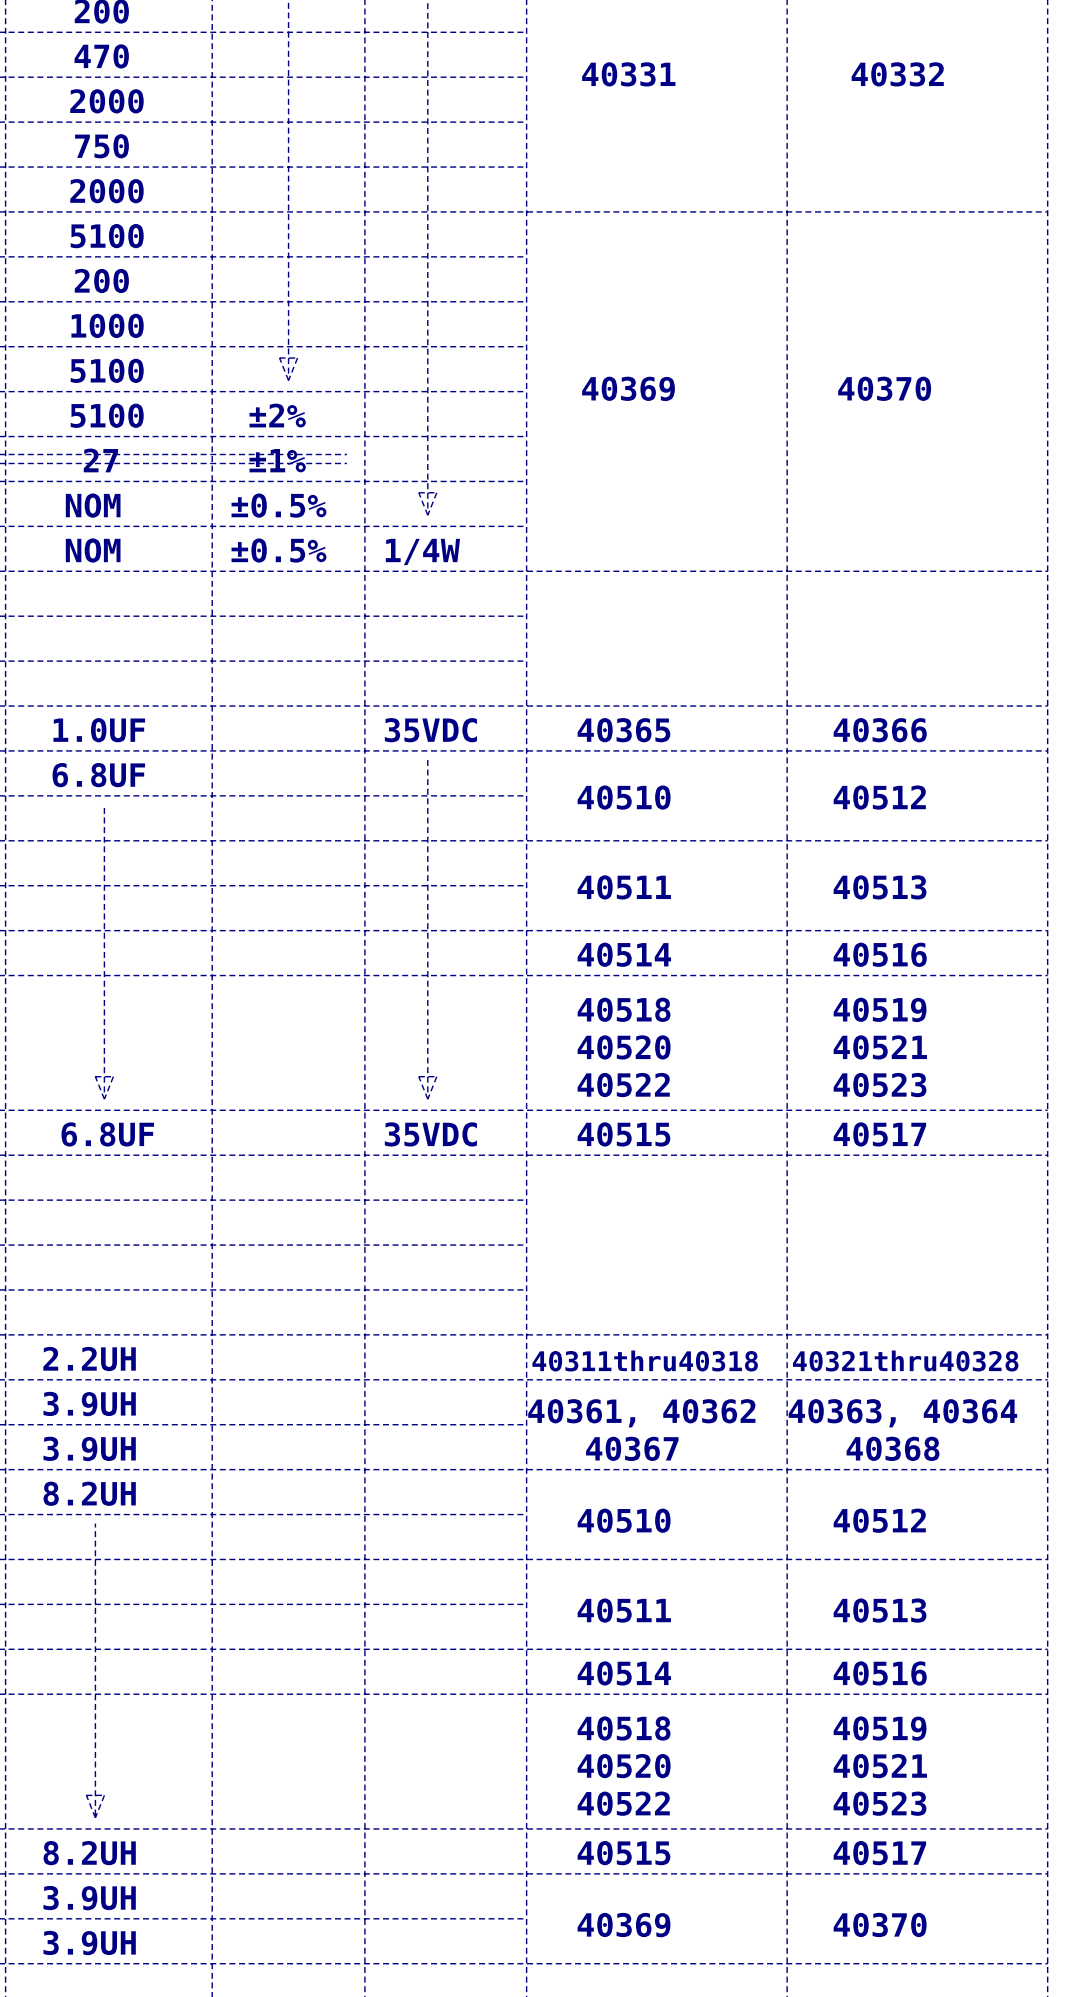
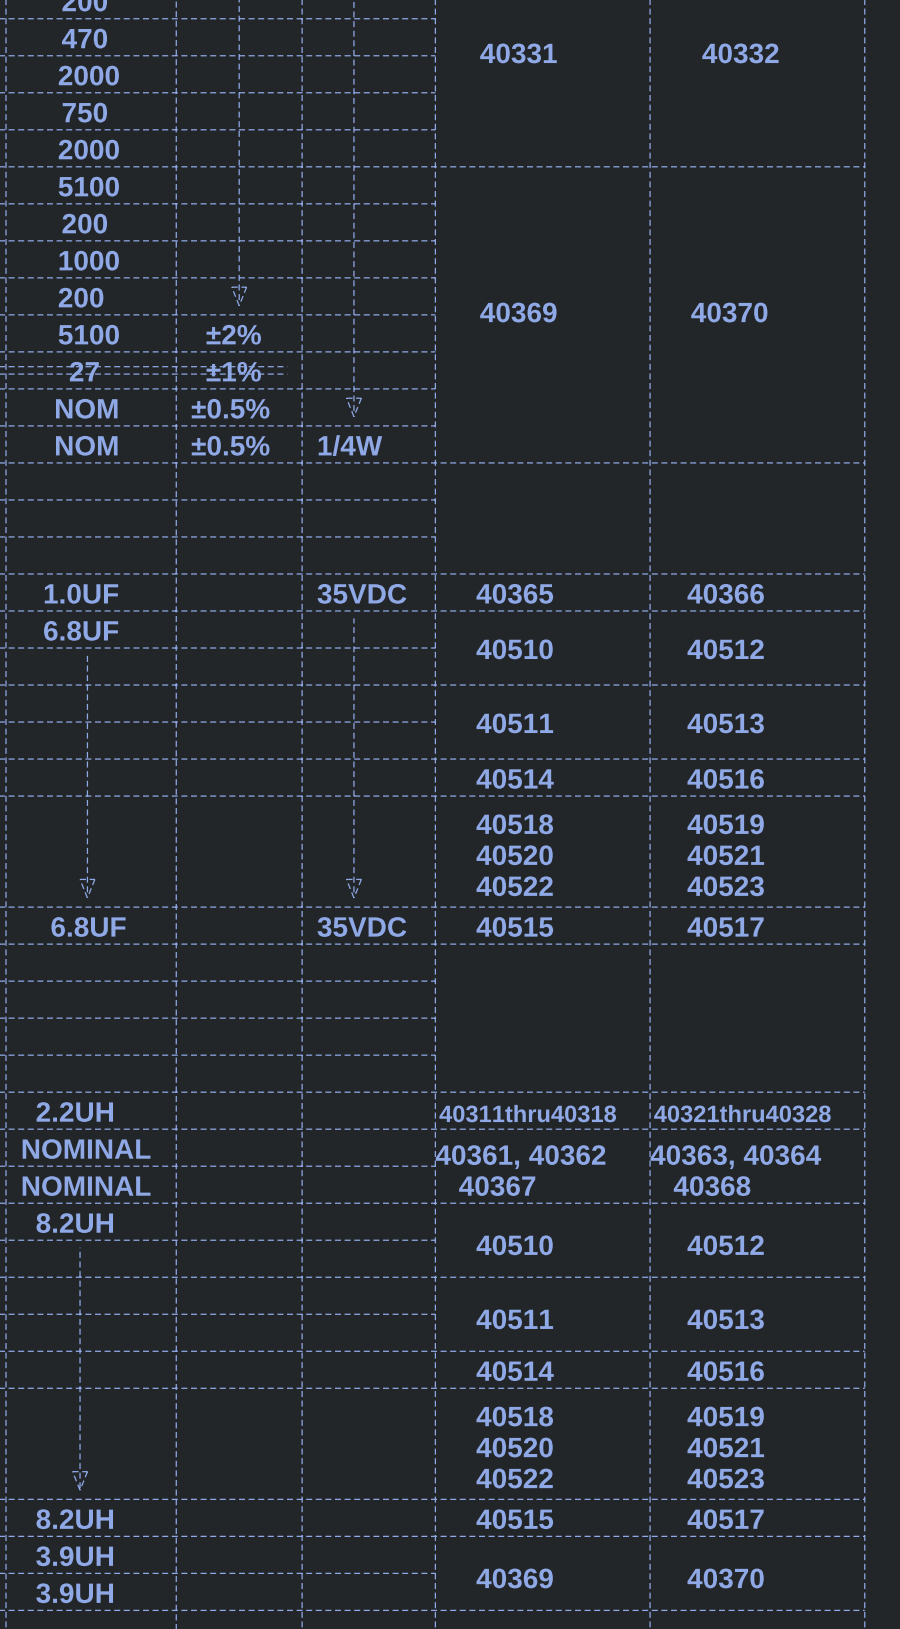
text: 5100 (107, 370) -> 200 (81, 297)
text: none -> NOMINAL (86, 1149)
text: 3.9UH (89, 1404) -> none
text: 3.9UH (89, 1448) -> none
text: none -> NOMINAL (86, 1186)

